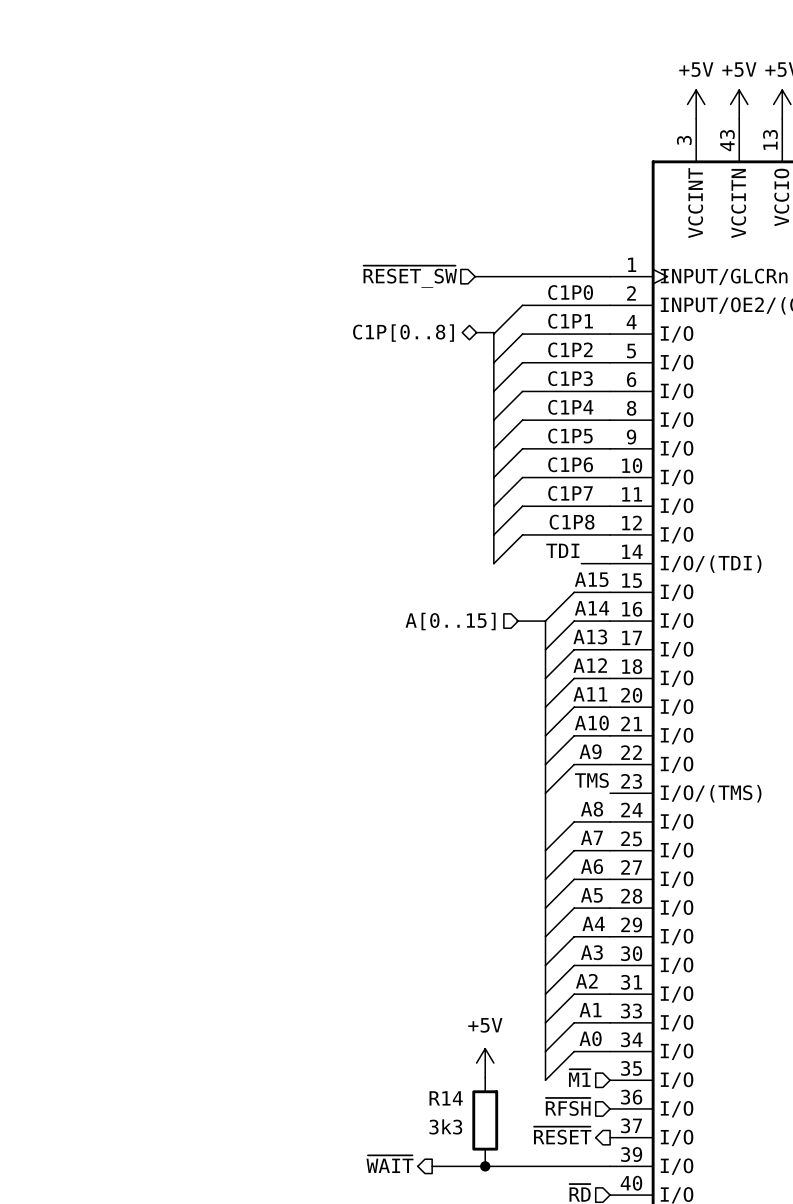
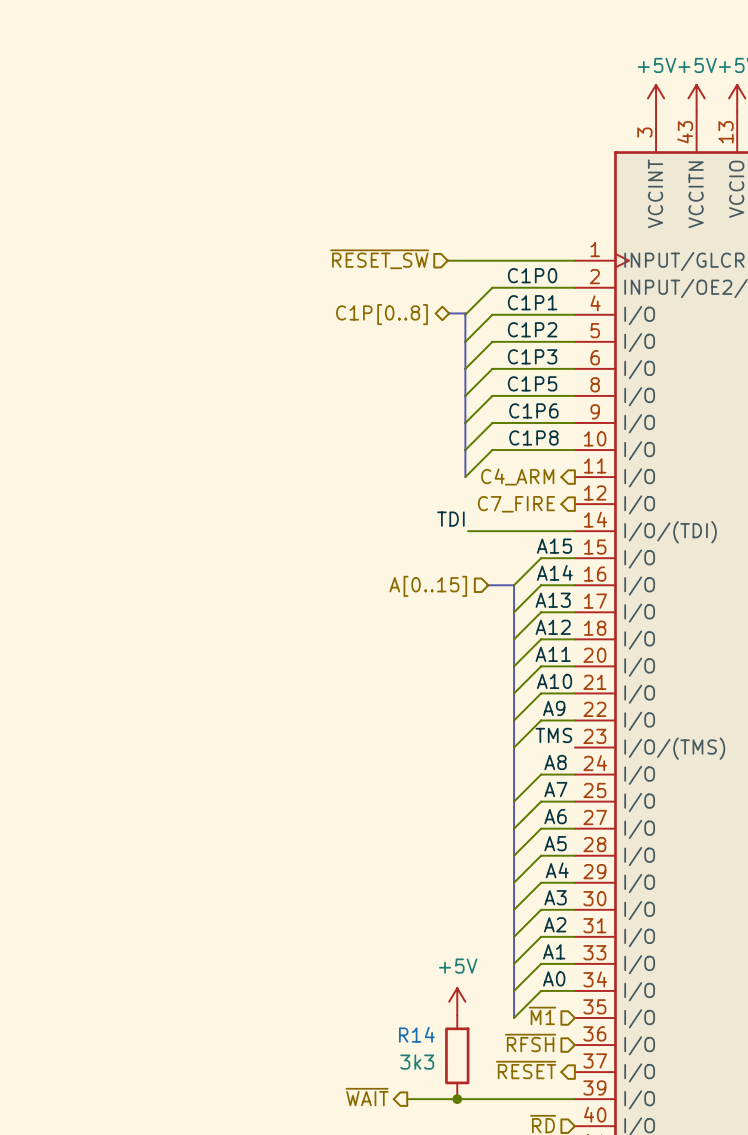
label: C1P4 (570, 407) -> C1P5 (532, 383)
label: C1P5 (570, 436) -> C1P6 (533, 410)
label: C1P6 (570, 464) -> C1P8 (533, 437)
label: C1P7 (570, 493) -> none
bus: (493, 506) (493, 563) -> none
wire: (610, 506) (522, 506) (493, 534) -> none
hierarchical label: none -> C4_ARM (517, 476)
label: C1P8 (572, 522) -> none
wire: (610, 534) (522, 534) (493, 563) -> none
hierarchical label: none -> C7_FIRE (516, 504)
label position: TDI (562, 550) -> TDI (450, 519)
wire: none -> (468, 531) (547, 531)

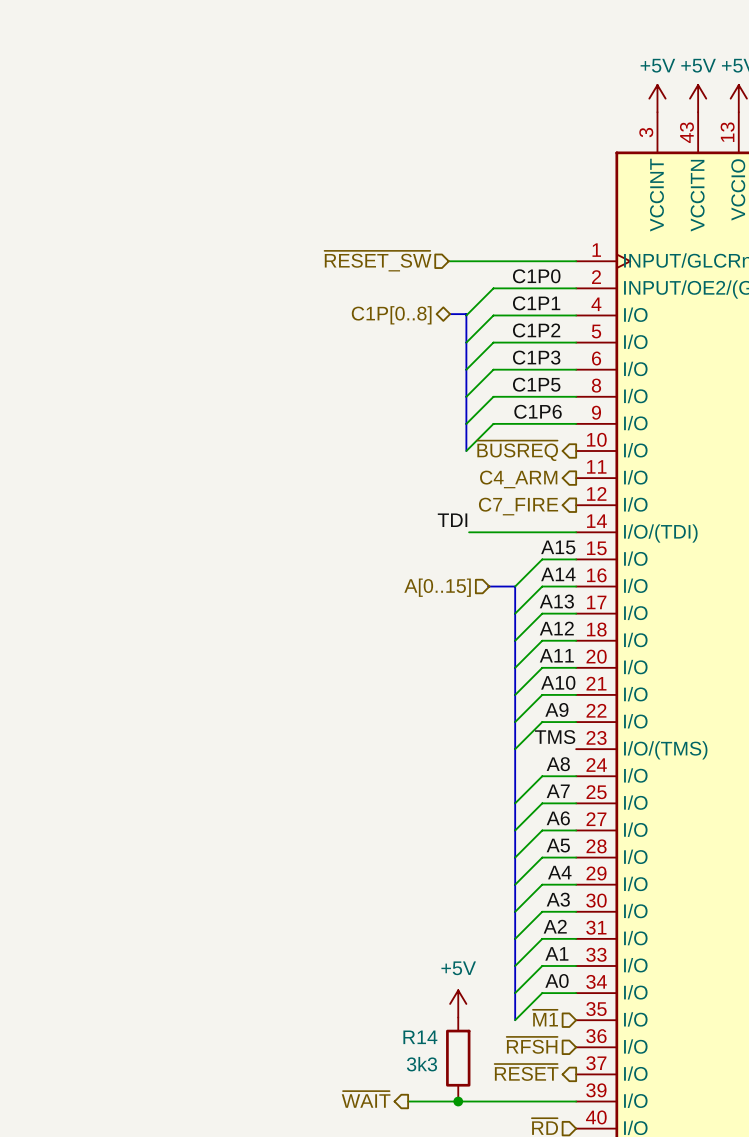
label: C1P8 (533, 437) -> none
hierarchical label: none -> ~{BUSREQ} (517, 450)
bus: (465, 450) (465, 477) -> none
wire: (574, 450) (492, 450) (465, 477) -> none

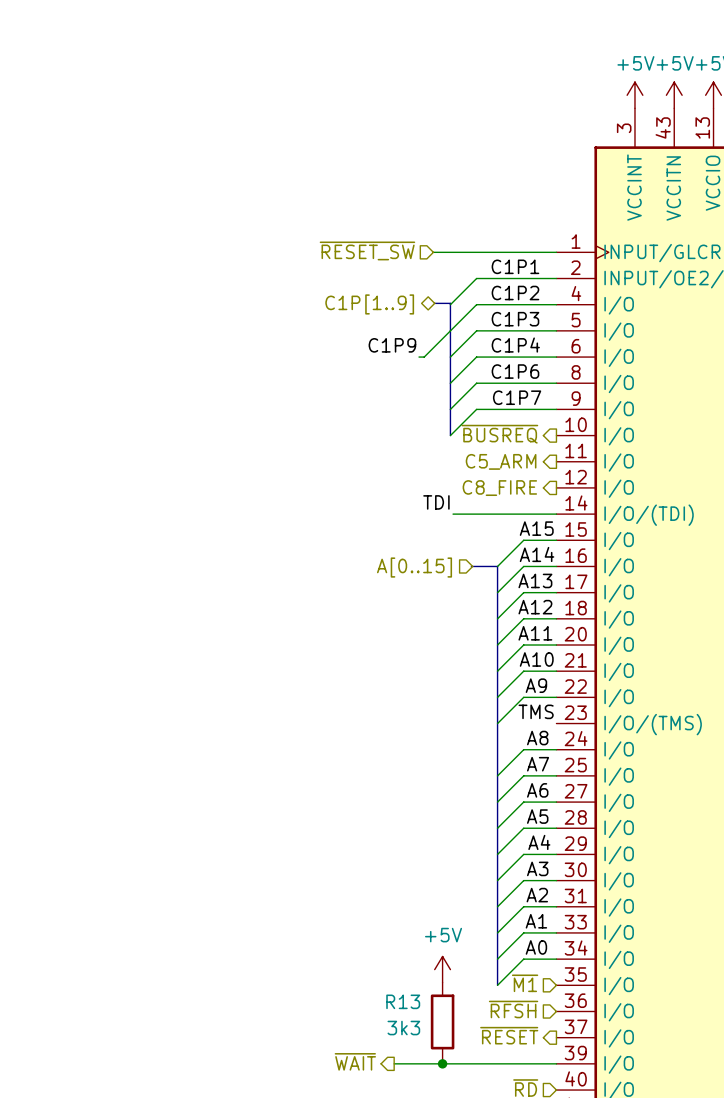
label: C1P0 (536, 276) -> C1P1 (515, 266)
label: C1P1 (536, 303) -> C1P2 (515, 293)
hierarchical label: C1P[0..8] (391, 315) -> C1P[1..9] (369, 304)
label: C1P2 (536, 330) -> C1P3 (515, 319)
wire: none -> (450, 330) (424, 357) (419, 357)
label: none -> C1P9 (392, 345)
label: C1P3 (536, 357) -> C1P4 (515, 345)
label: C1P5 (536, 384) -> C1P6 (515, 371)
label: C1P6 (538, 411) -> C1P7 (517, 397)
hierarchical label: C4_ARM (518, 479) -> C5_ARM (501, 461)
hierarchical label: C7_FIRE (518, 506) -> C8_FIRE (499, 488)
R14 name: R14 (420, 1037) -> R13 (403, 1001)

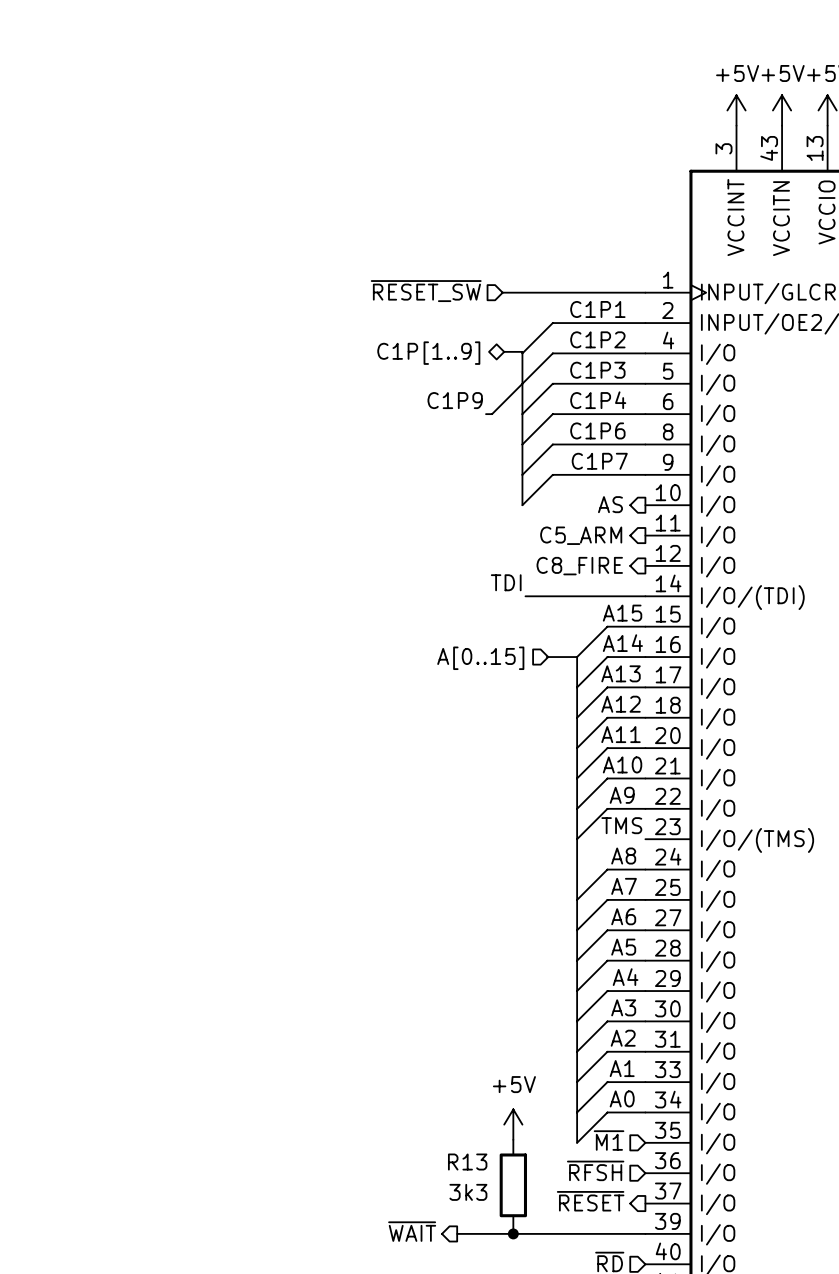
hierarchical label: ~{BUSREQ} (499, 434) -> AS (610, 504)

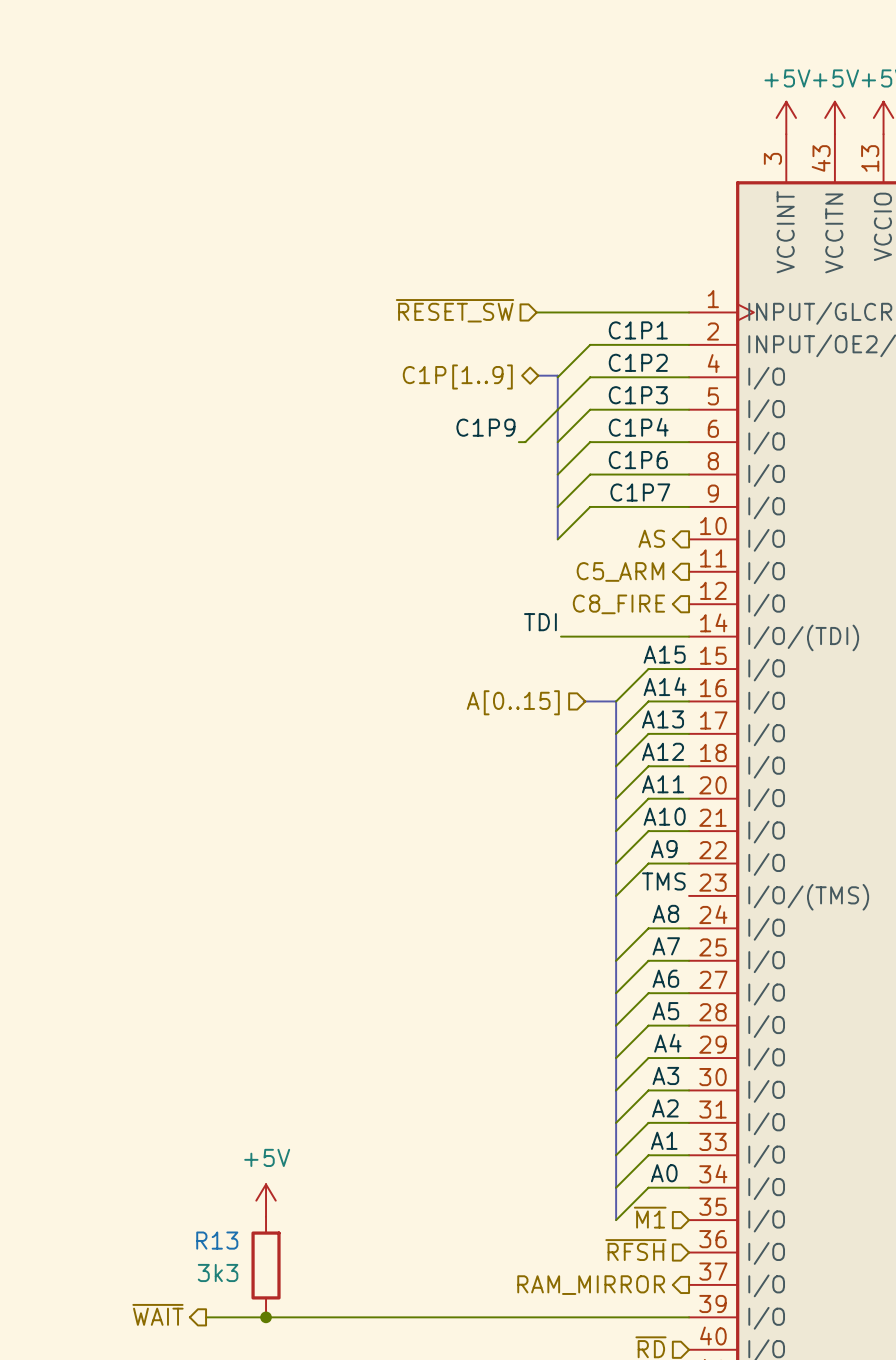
power symbol position: +5V (513, 1124) -> +5V (266, 1200)
R13 position: (513, 1185) -> (266, 1265)
hierarchical label: ~{RESET} (590, 1201) -> RAM_MIRROR (591, 1285)
hierarchical label position: ~{WAIT} (412, 1231) -> ~{WAIT} (157, 1314)
wire: none -> (206, 1317) (488, 1317)
junction: none -> (266, 1317)
junction: (513, 1233) -> none

